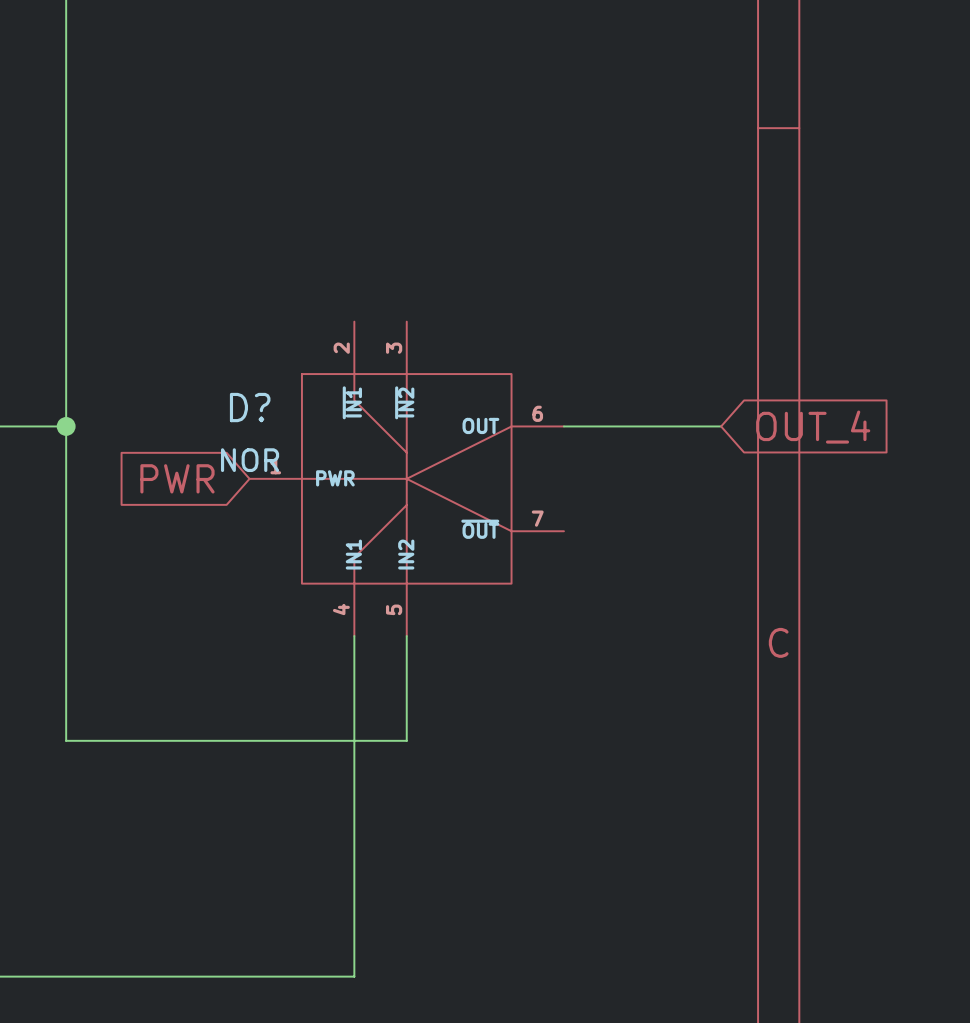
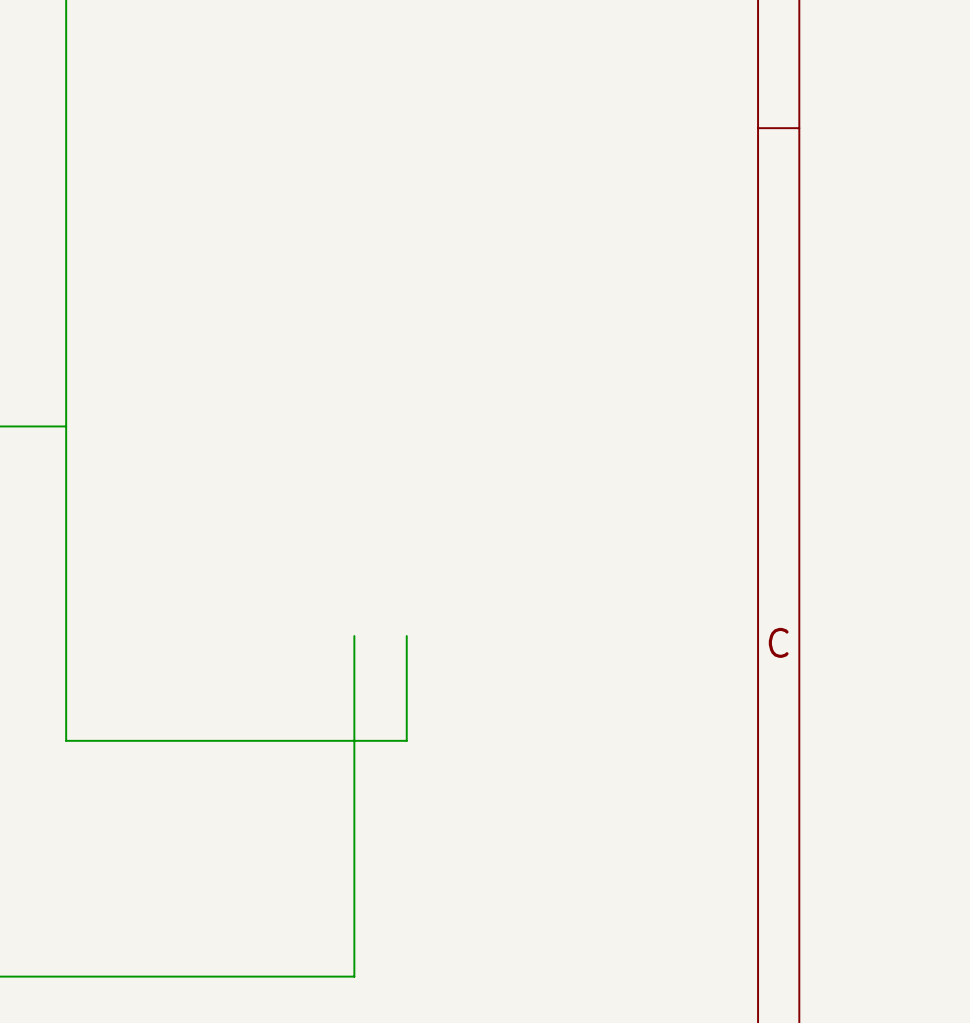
junction: (66, 426) -> none
wire: (563, 426) (721, 426) -> none
global label: OUT_4 (813, 427) -> none
global label: PWR (177, 478) -> none
D?: NOR (406, 478) -> none

